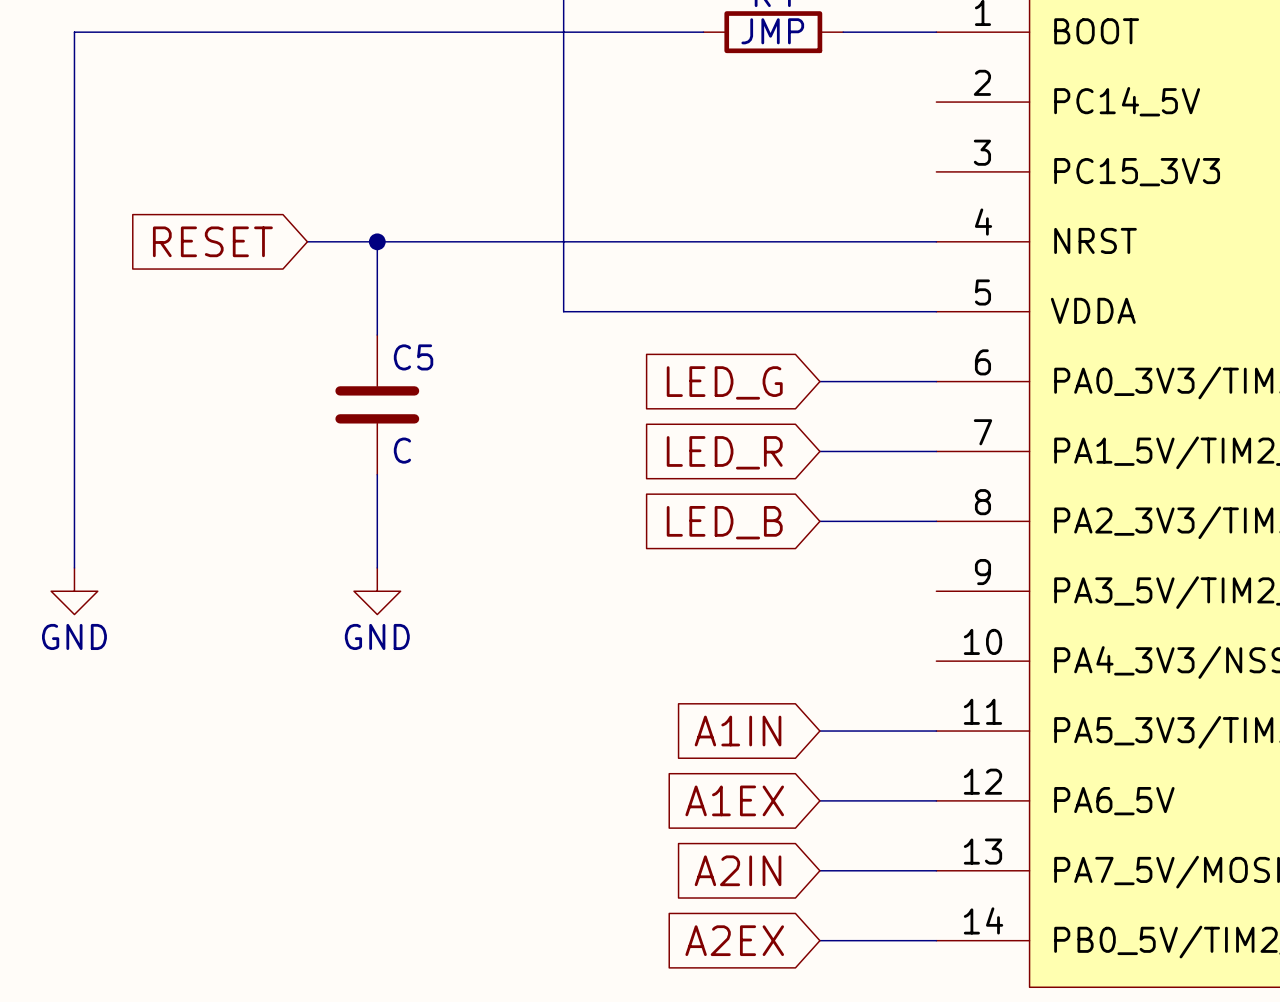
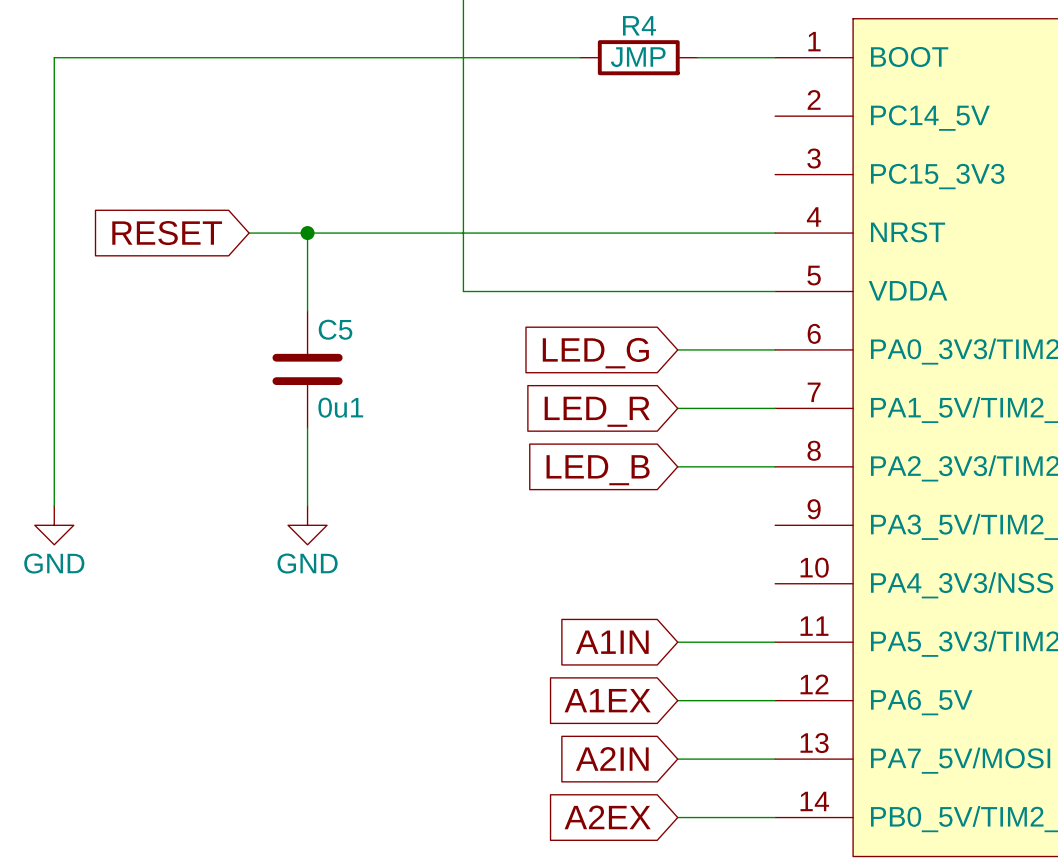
C5 value: C (402, 450) -> 0u1 (340, 407)

